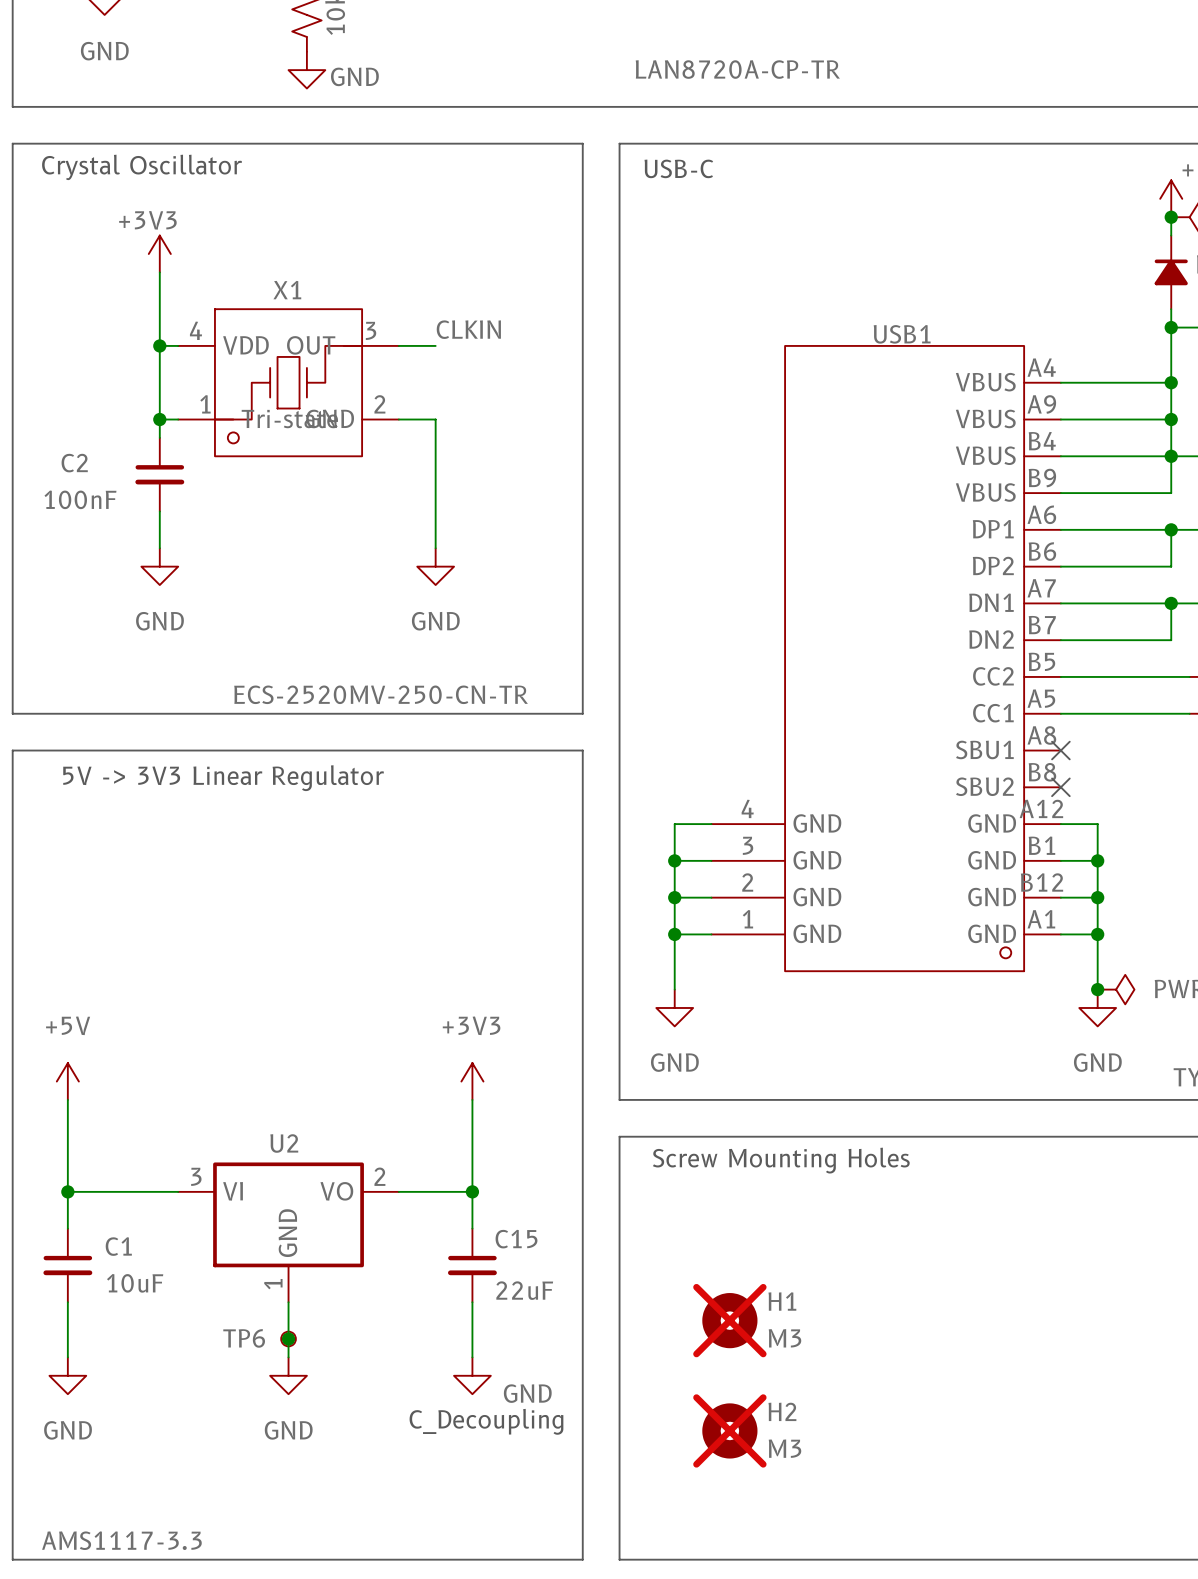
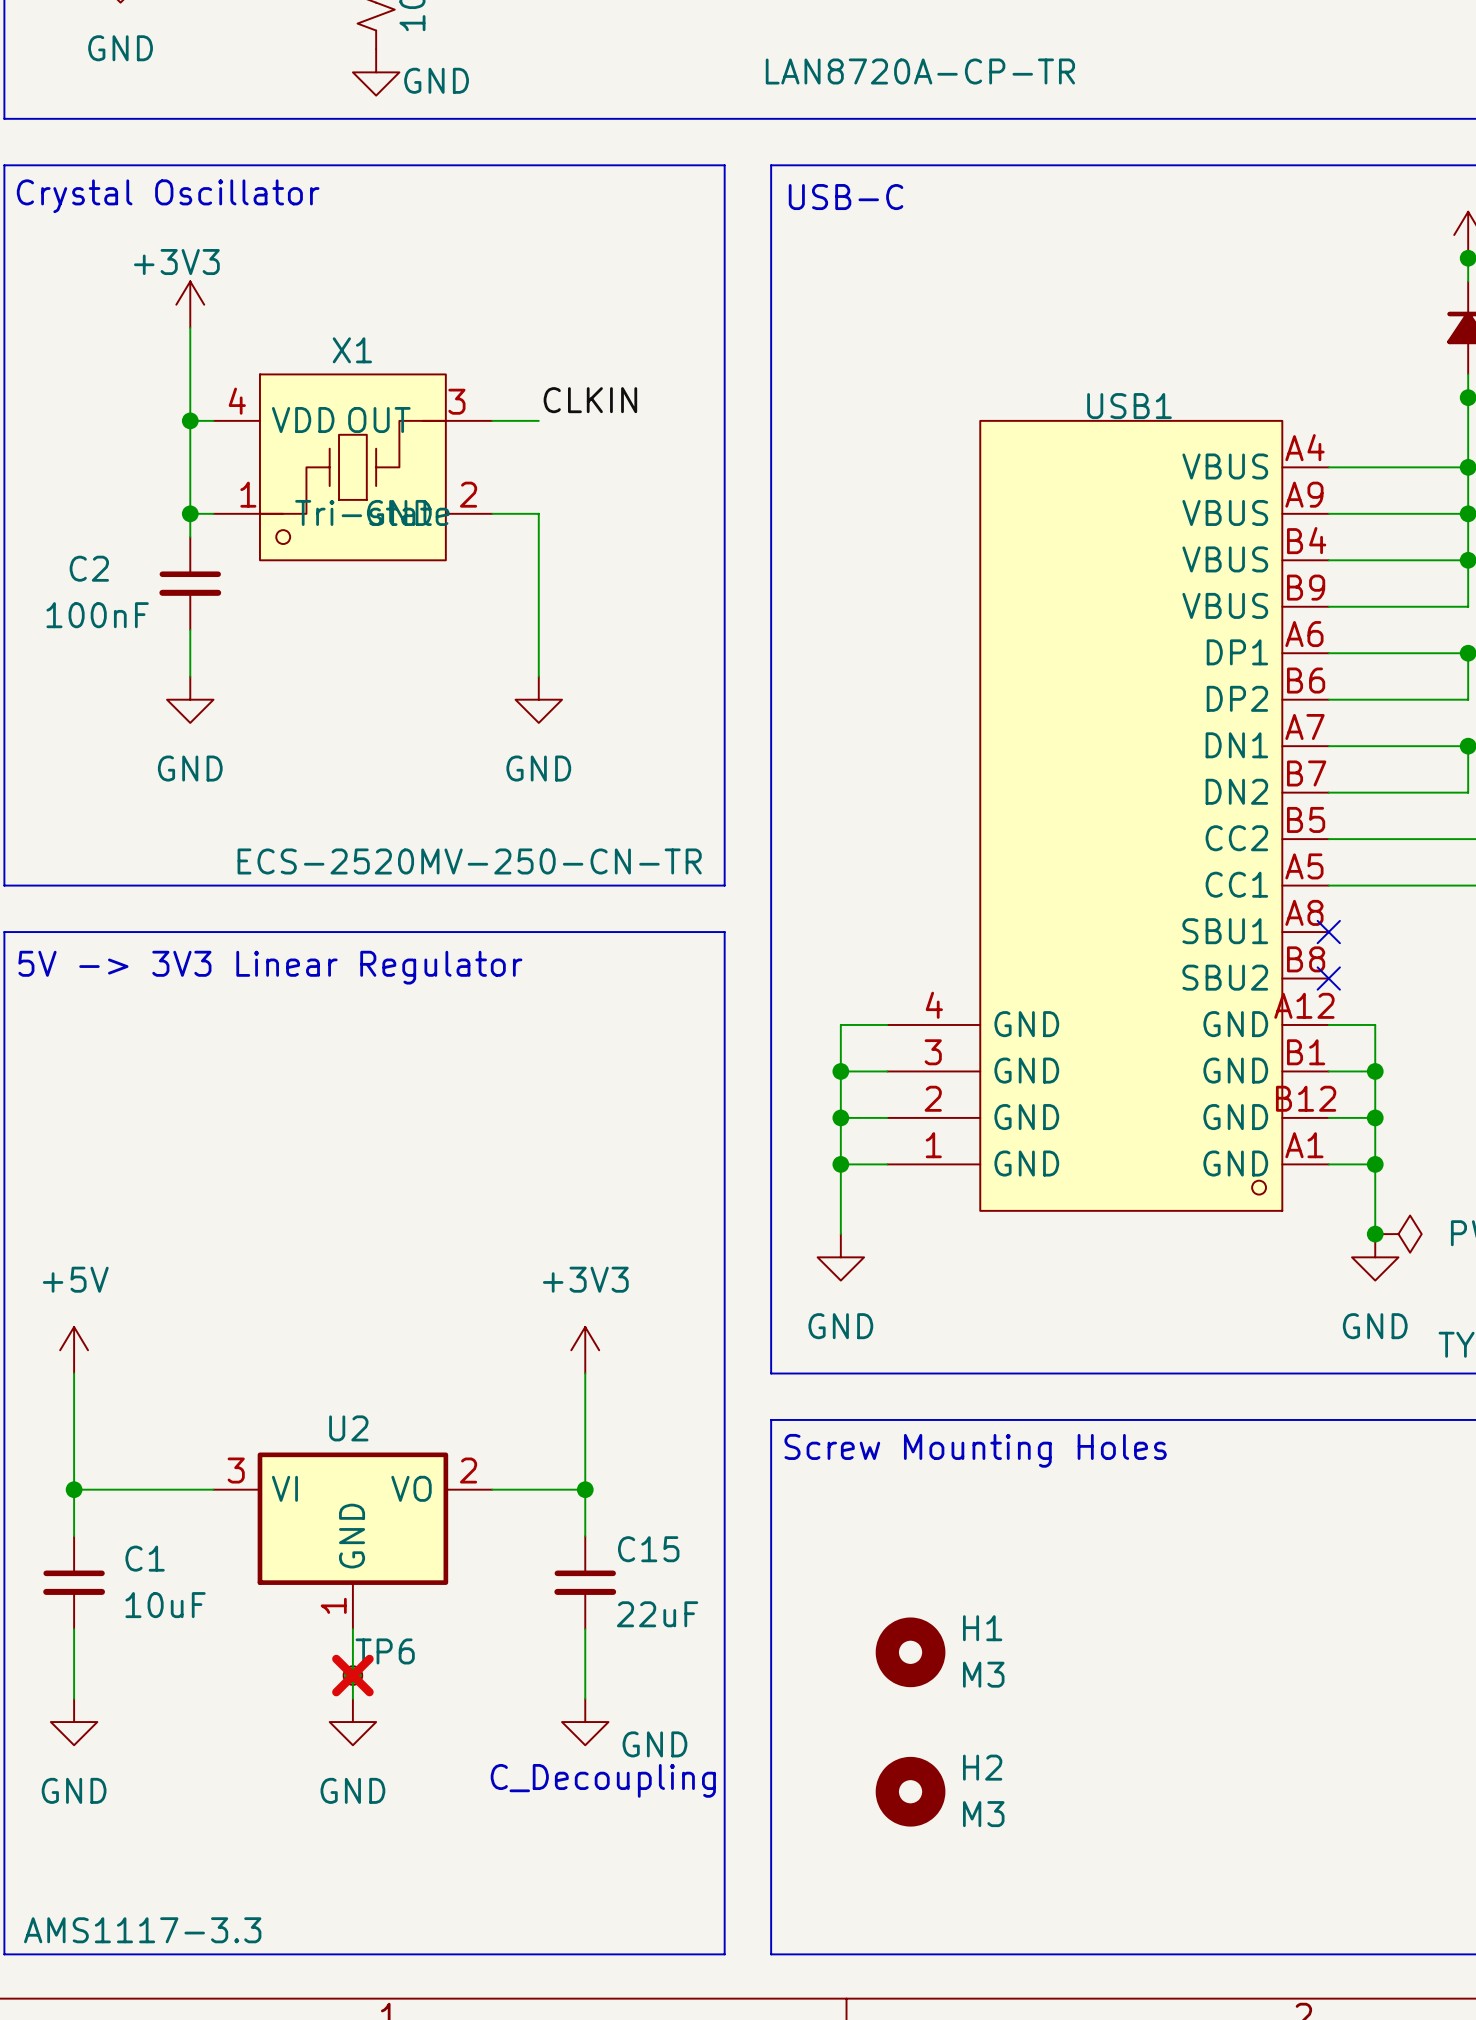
H1 do-not-place cross: (729, 1320) -> none
TP6 name position: TP6 (244, 1338) -> TP6 (385, 1651)
TP6 do-not-place cross: none -> (352, 1675)
H2 do-not-place cross: (729, 1430) -> none

